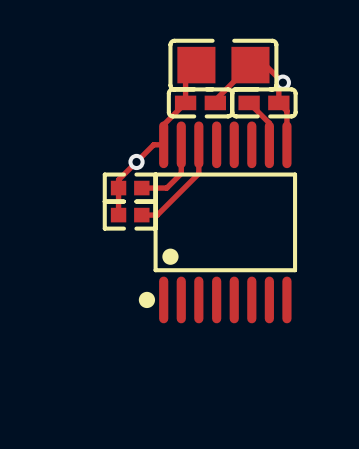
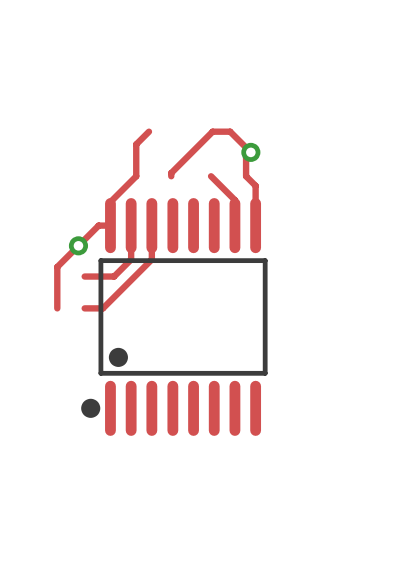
part: (223, 65) -> none
part: (200, 102) -> none
part: (263, 102) -> none
part: (130, 188) -> none
part: (130, 215) -> none

